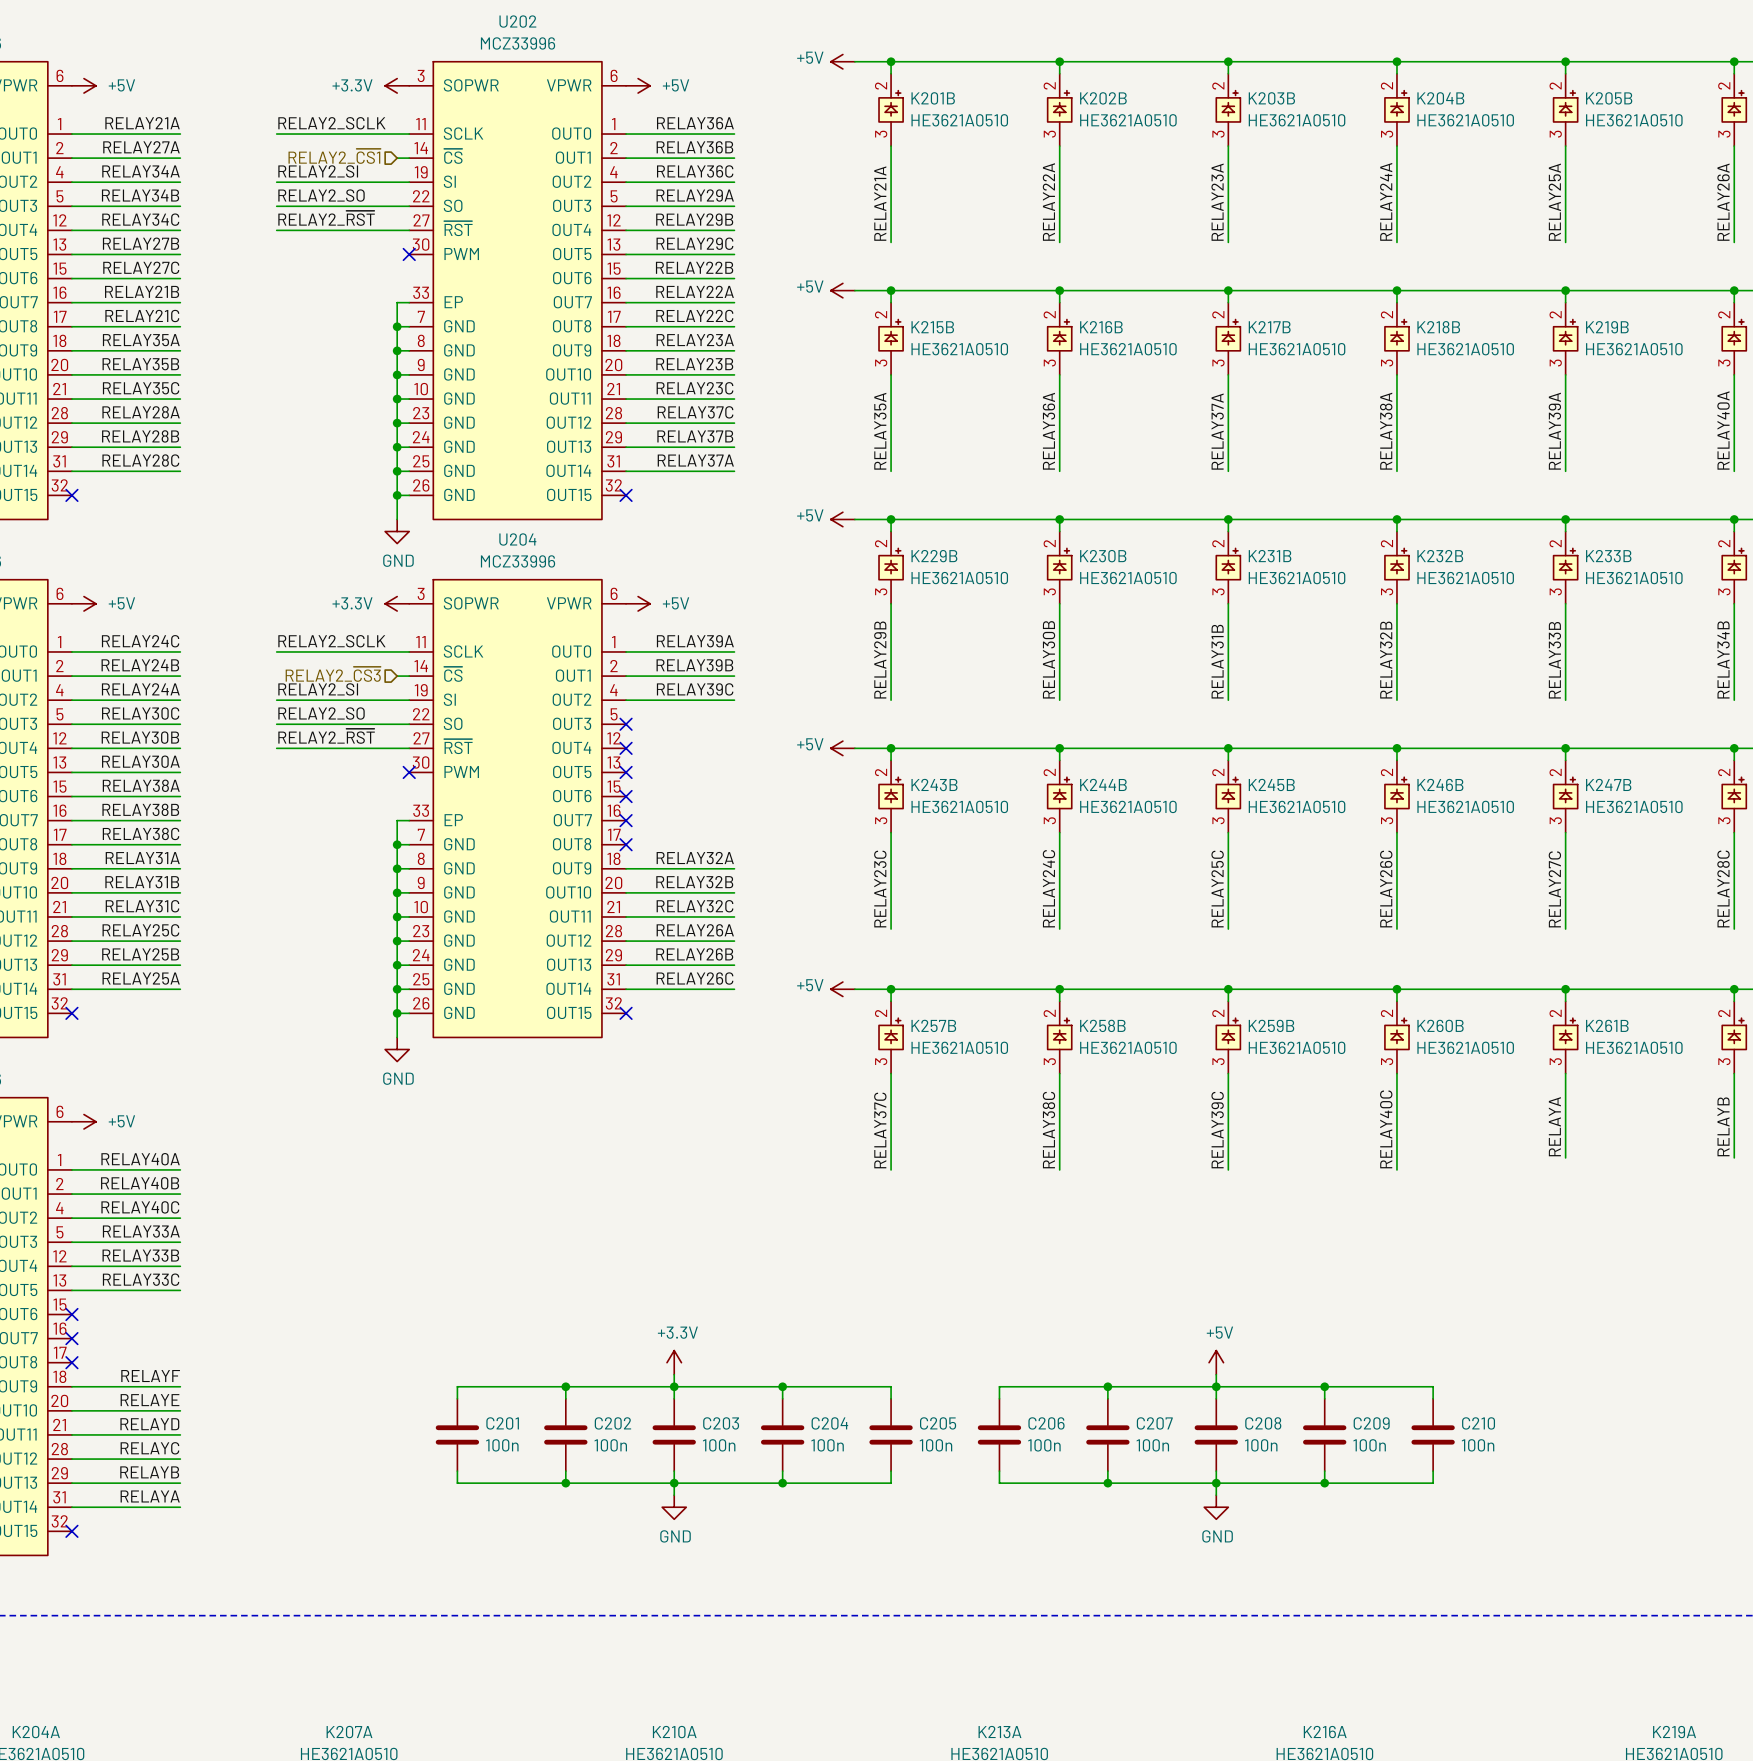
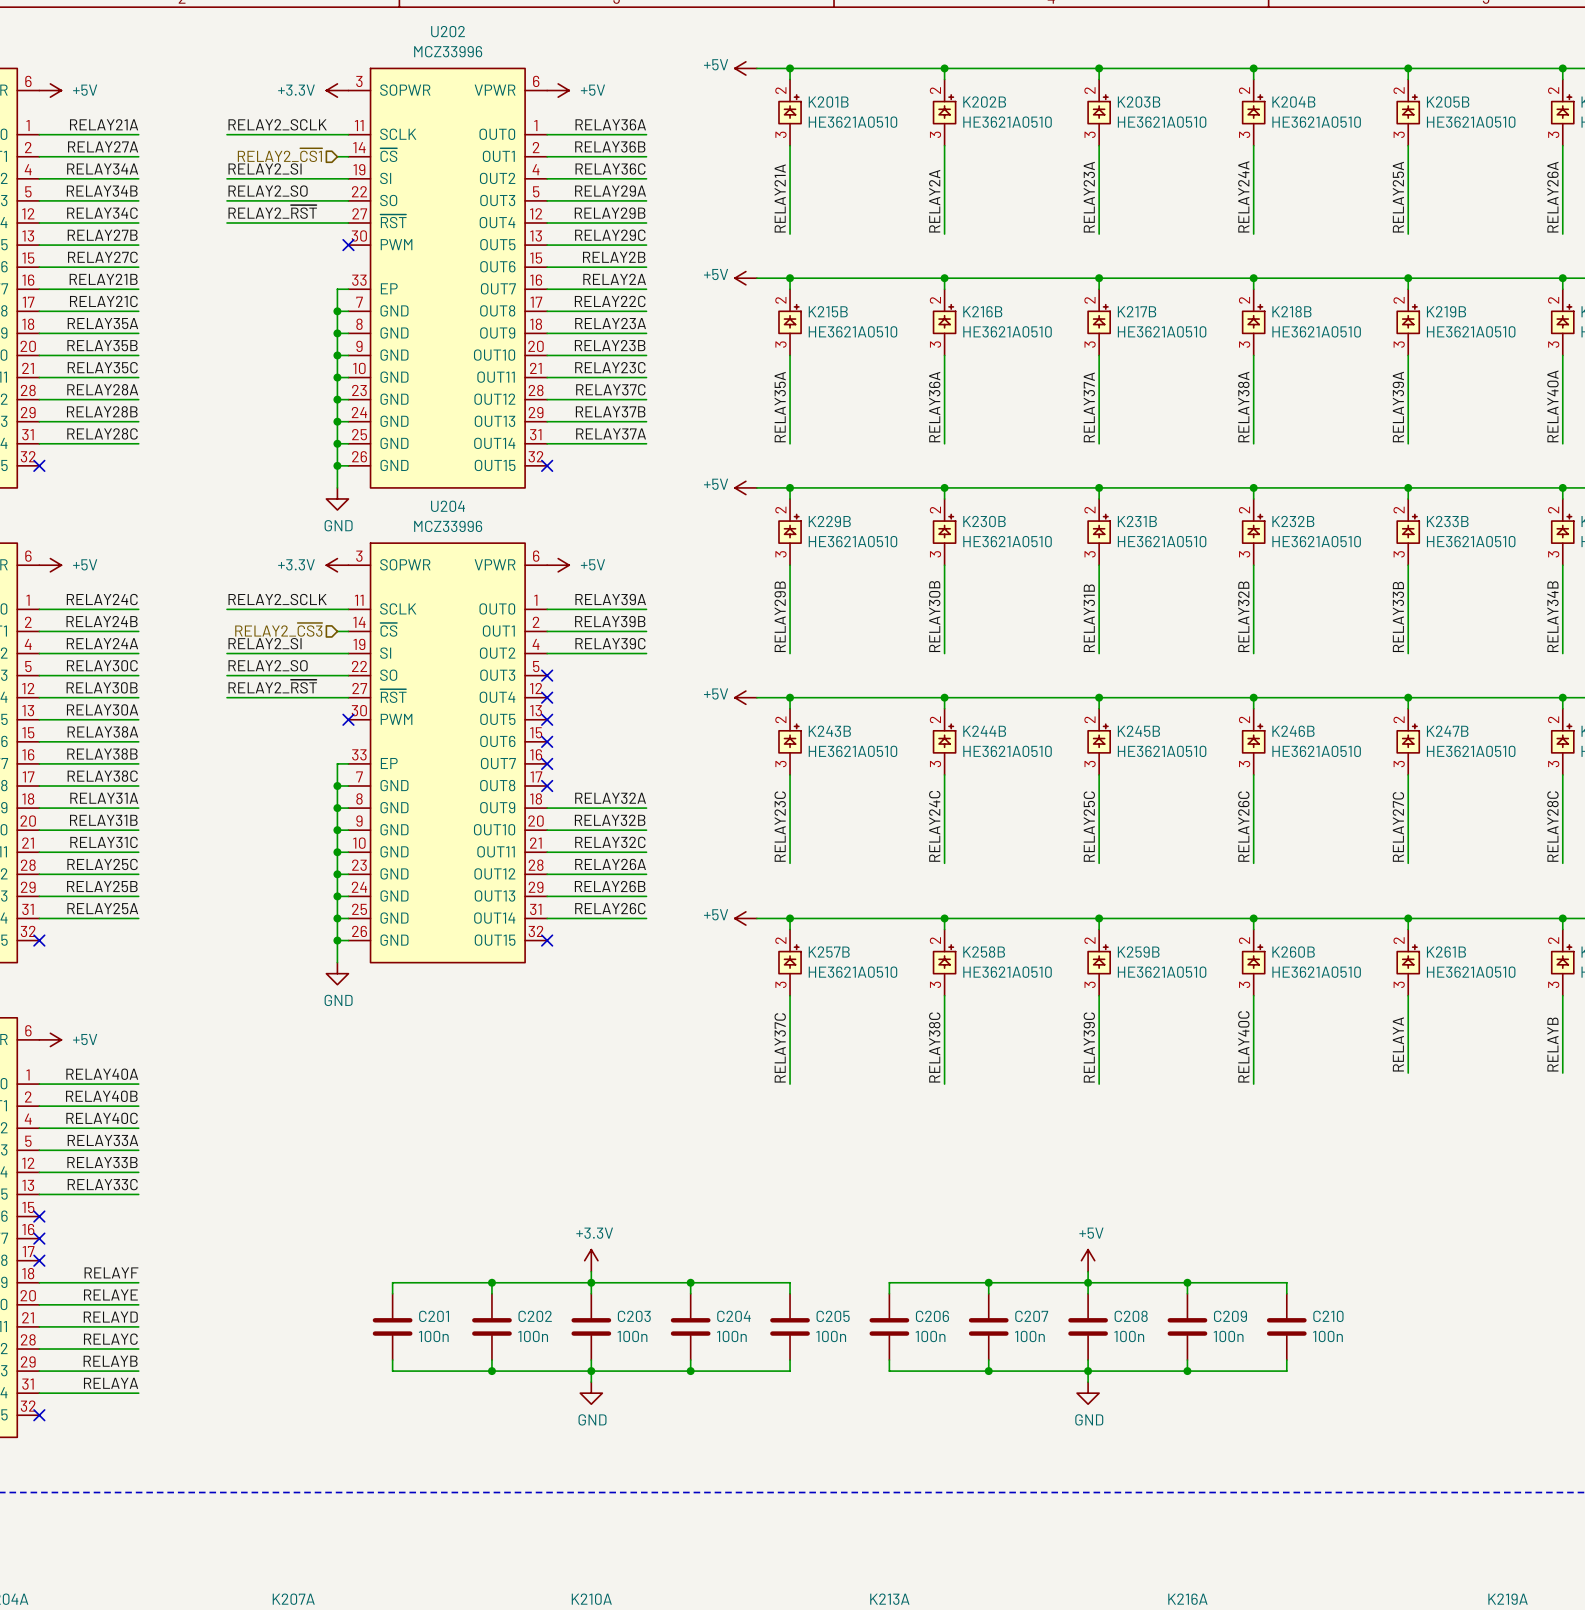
label: RELAY22A (1048, 202) -> RELAY2A (934, 201)
label: RELAY22B (694, 267) -> RELAY2B (614, 257)
label: RELAY22A (695, 291) -> RELAY2A (614, 279)

